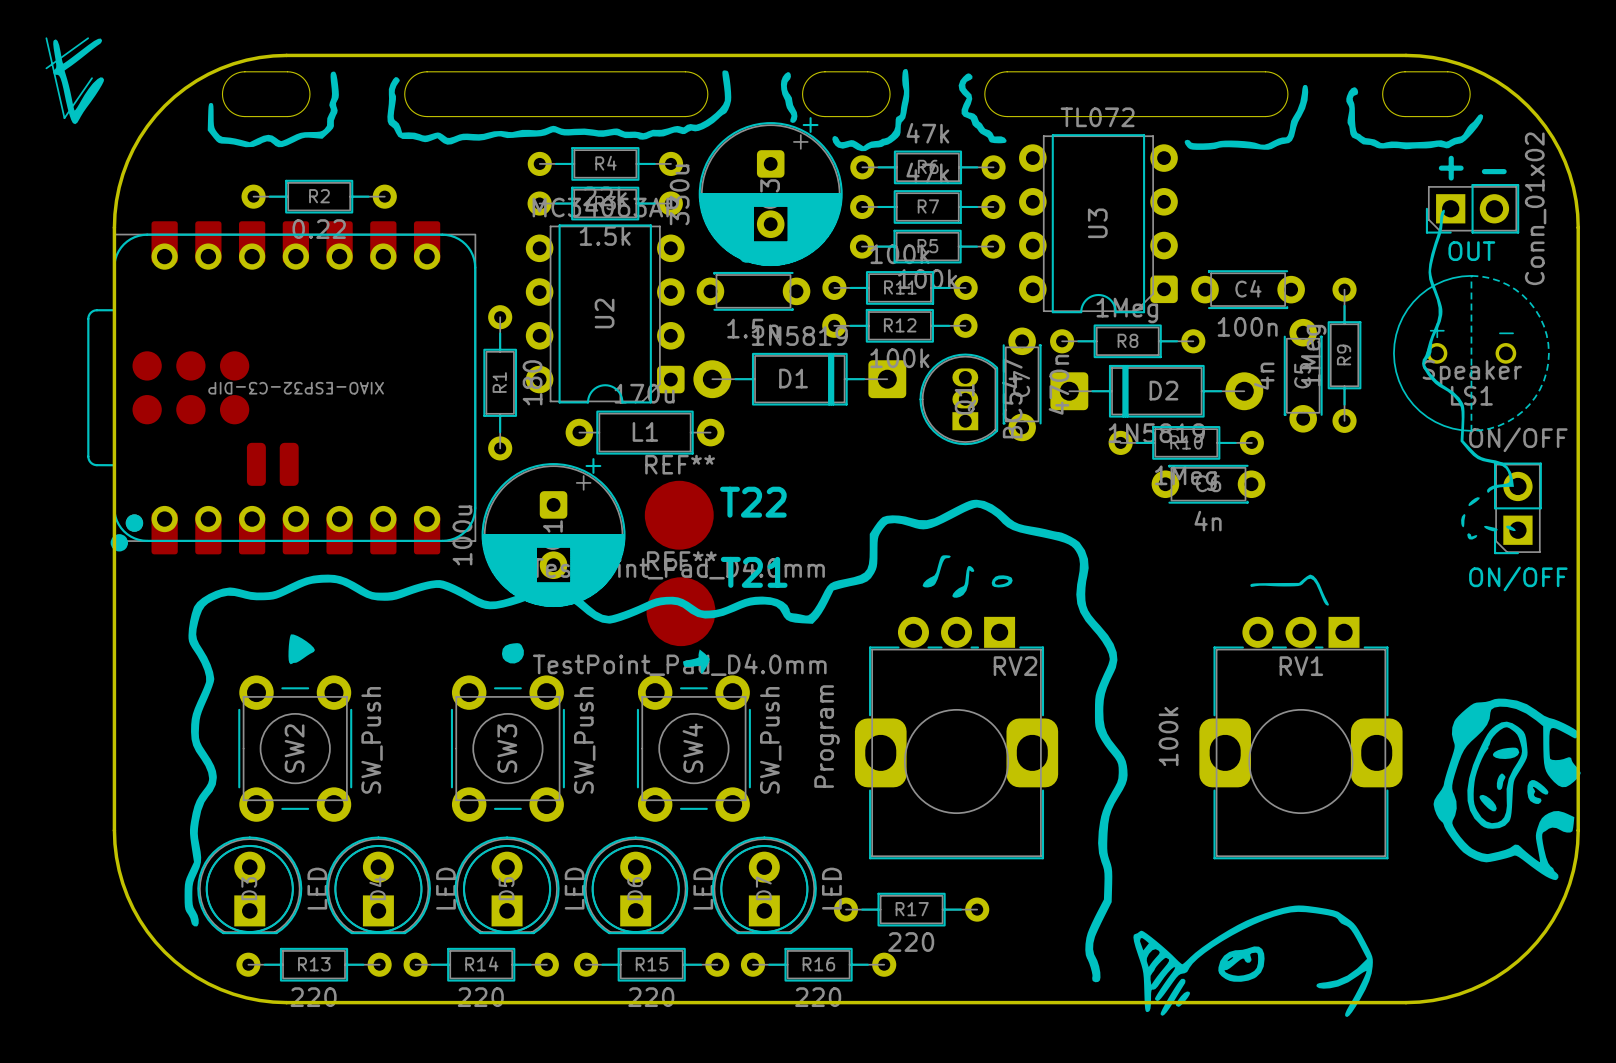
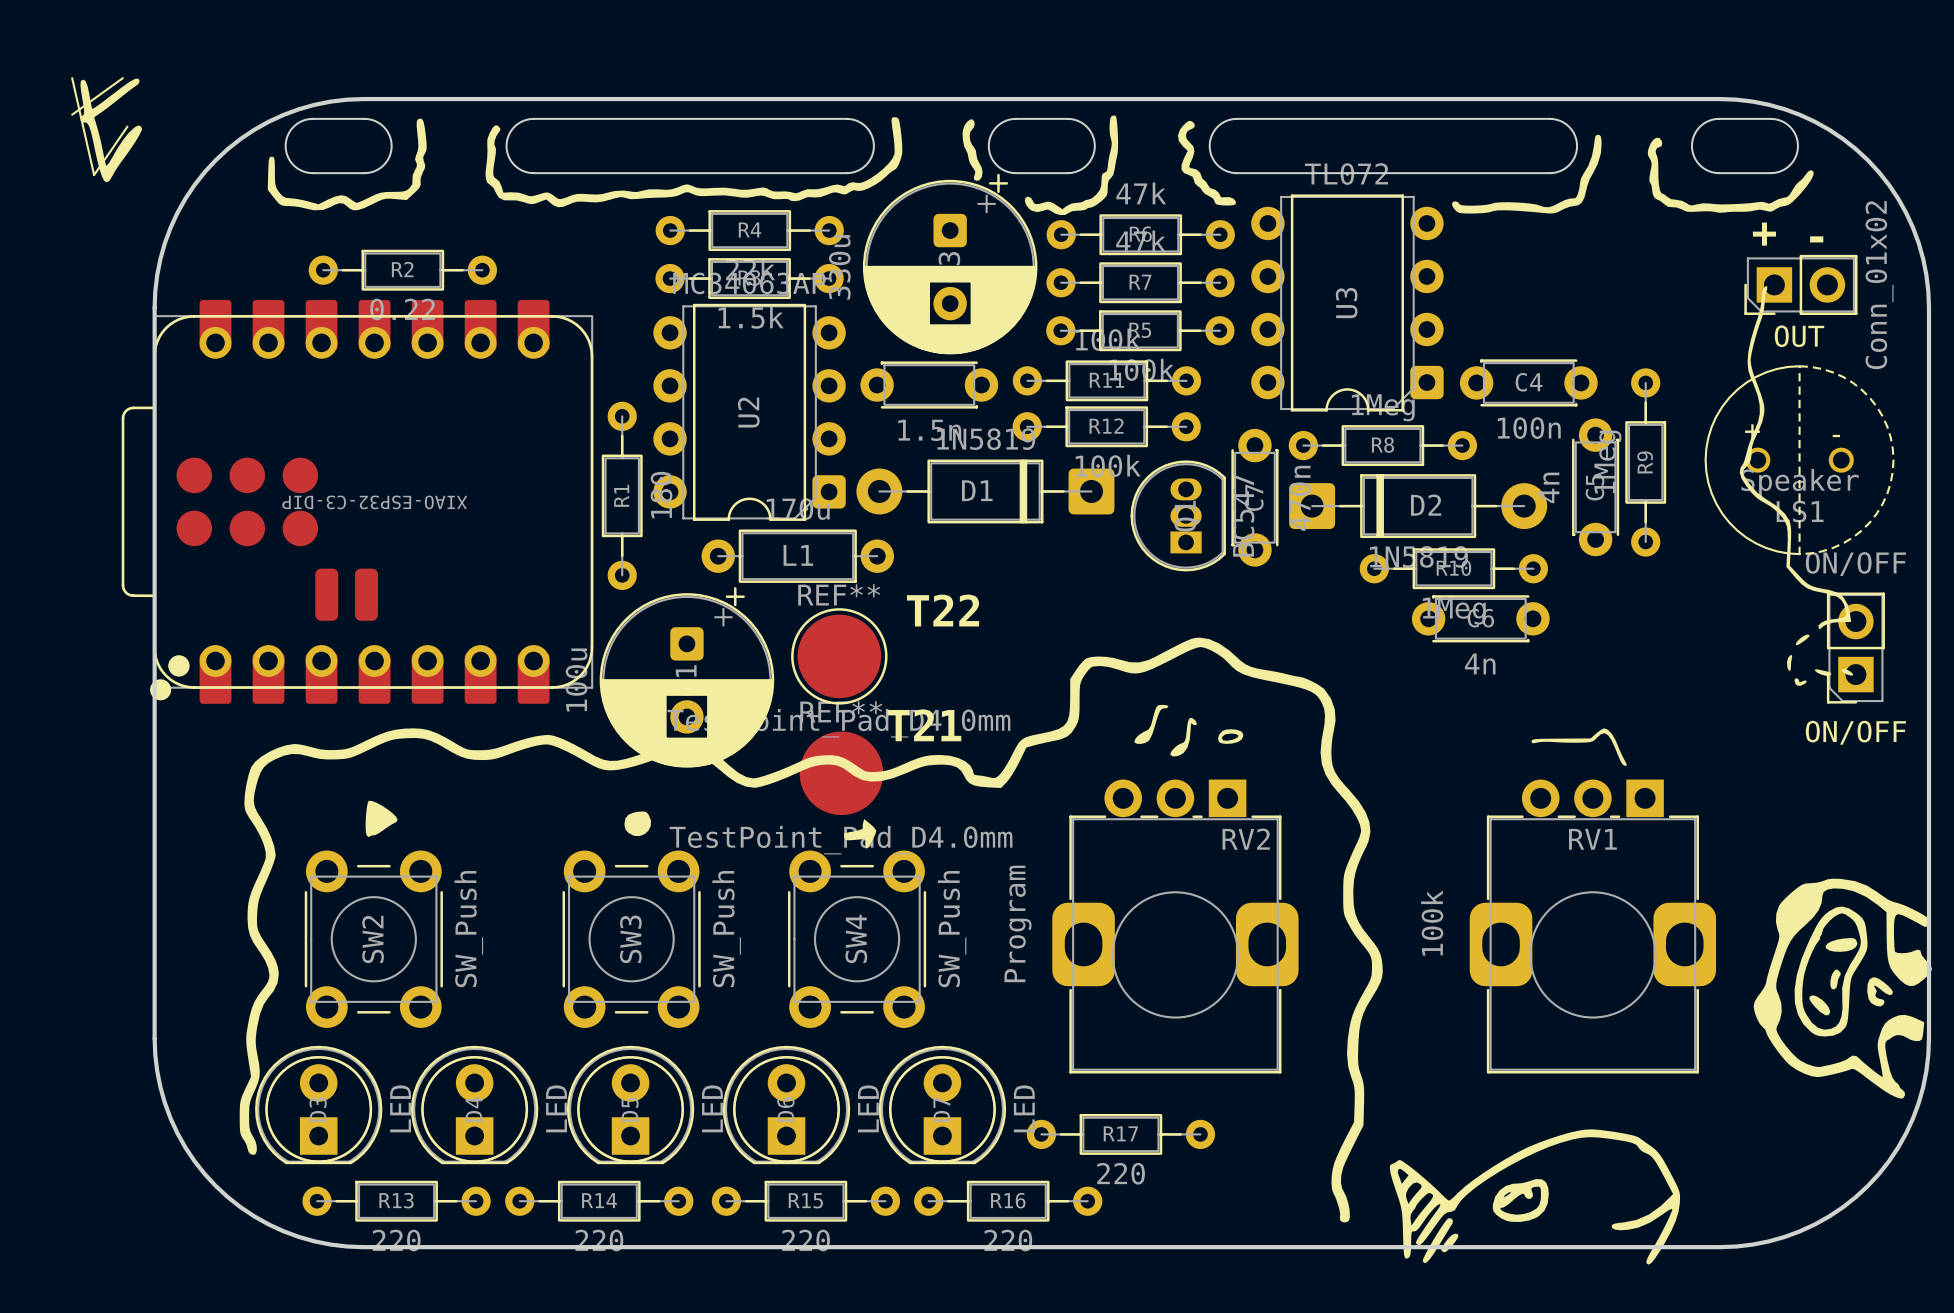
REF** footprint: [644, 480, 714, 550] -> [791, 608, 888, 705]
text position: T22 (753, 502) -> T22 (943, 610)

